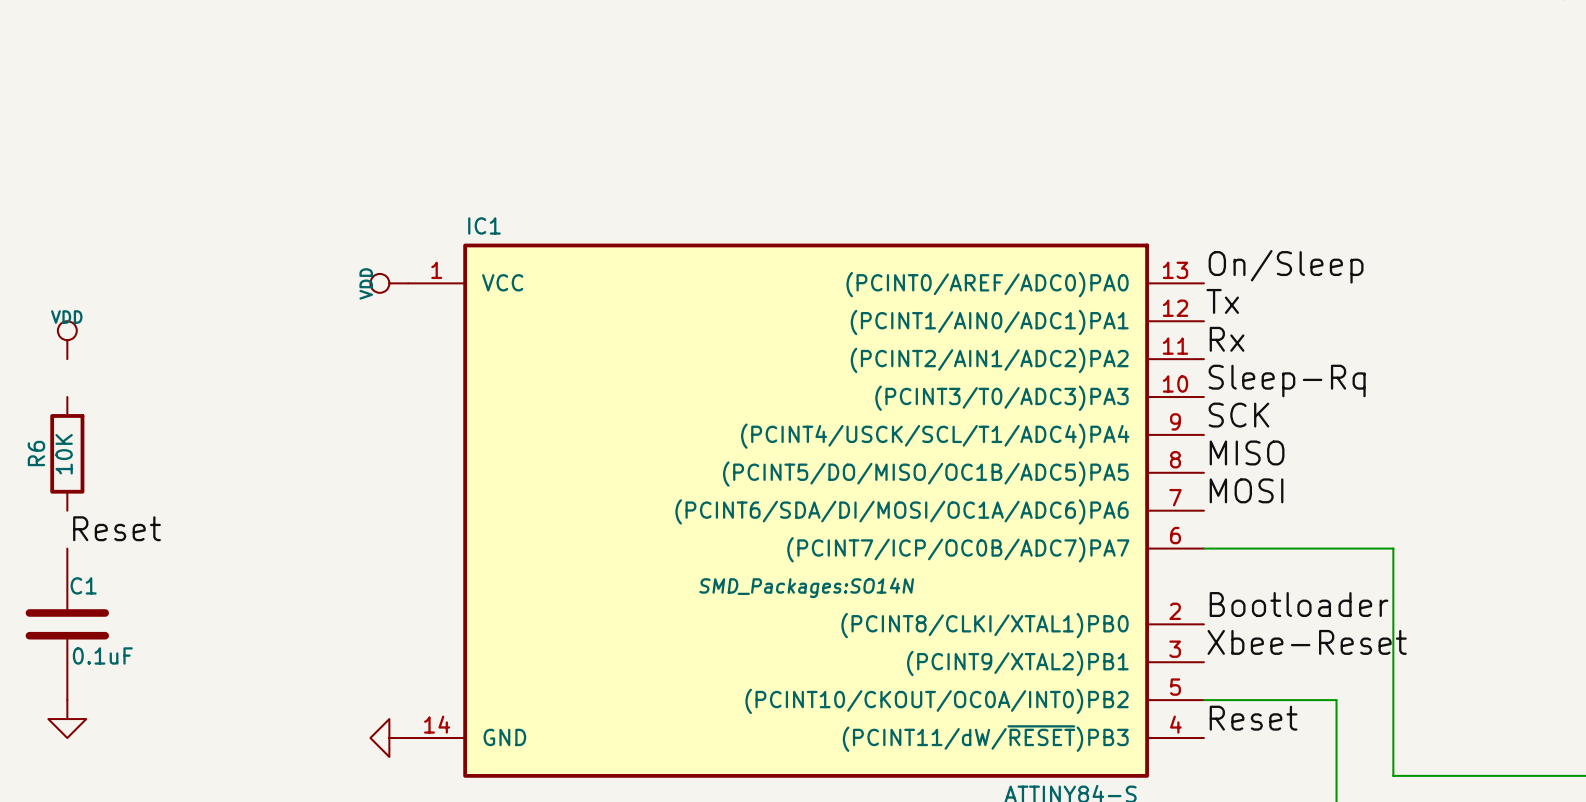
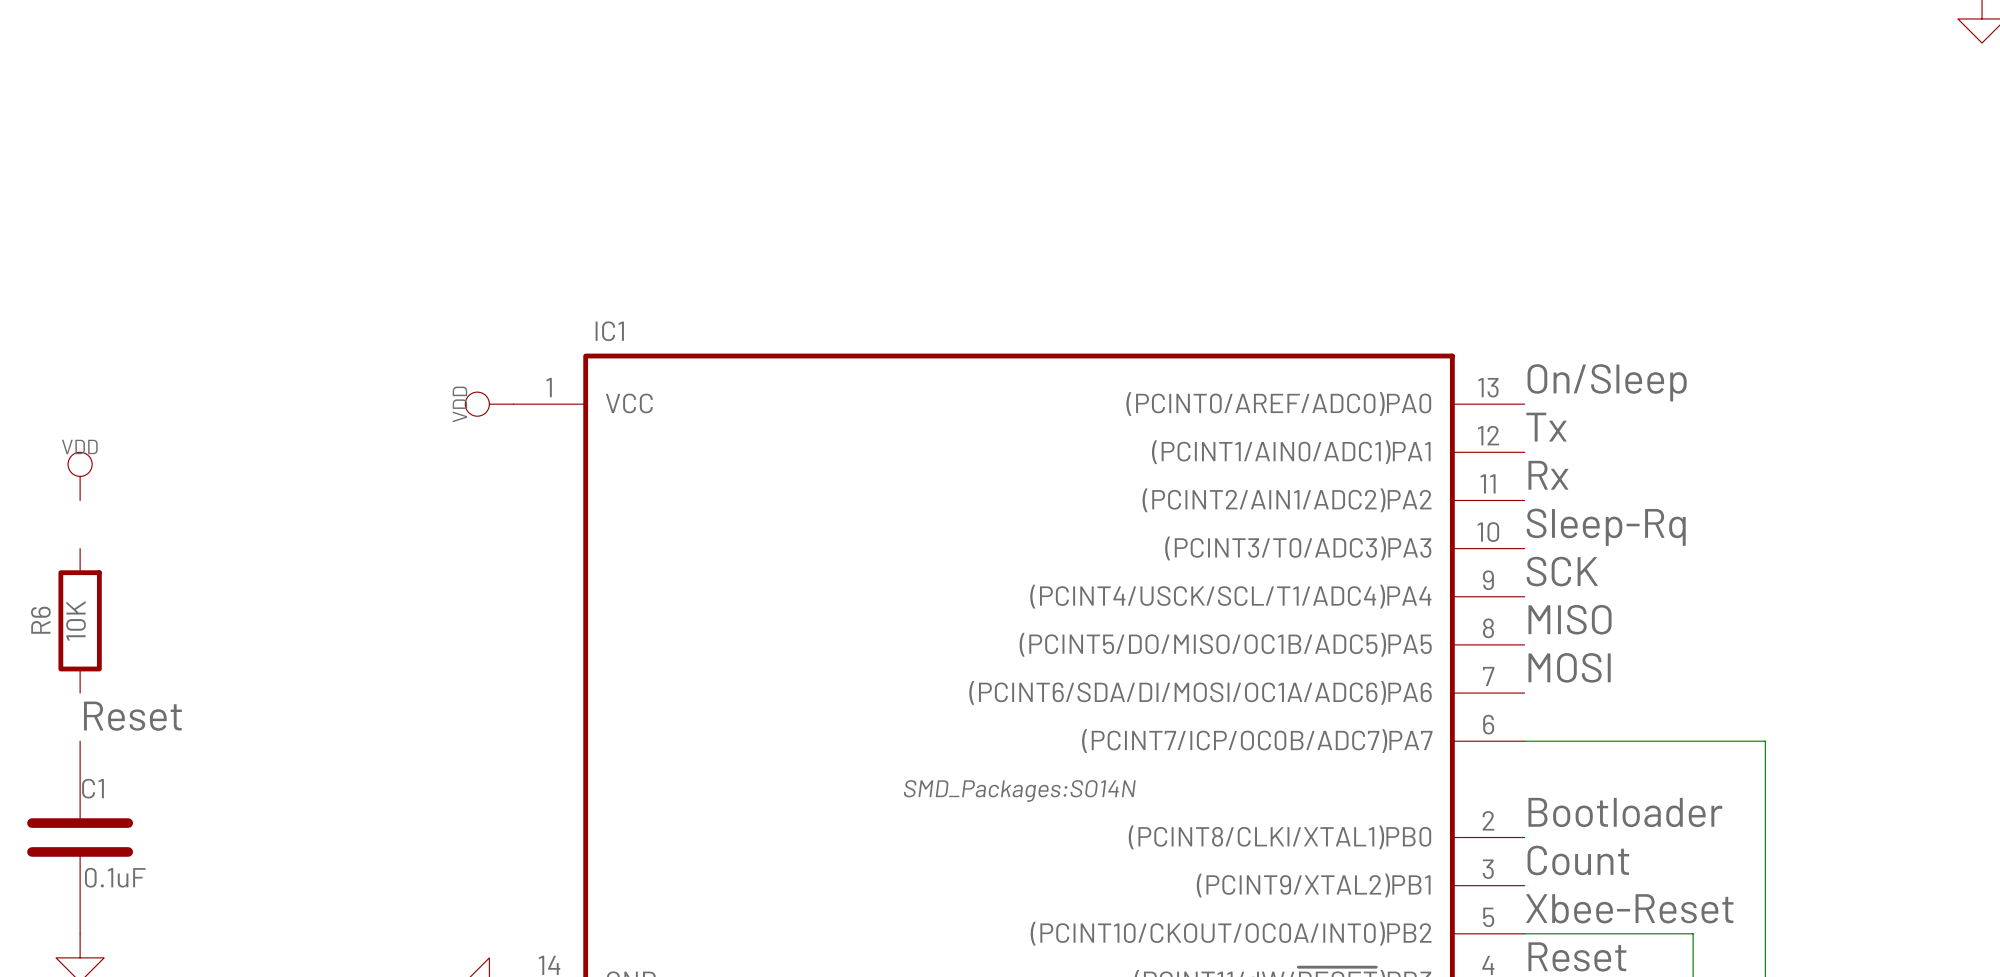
label: Xbee-Reset (1307, 642) -> Count (1578, 860)
label: none -> Xbee-Reset (1629, 908)

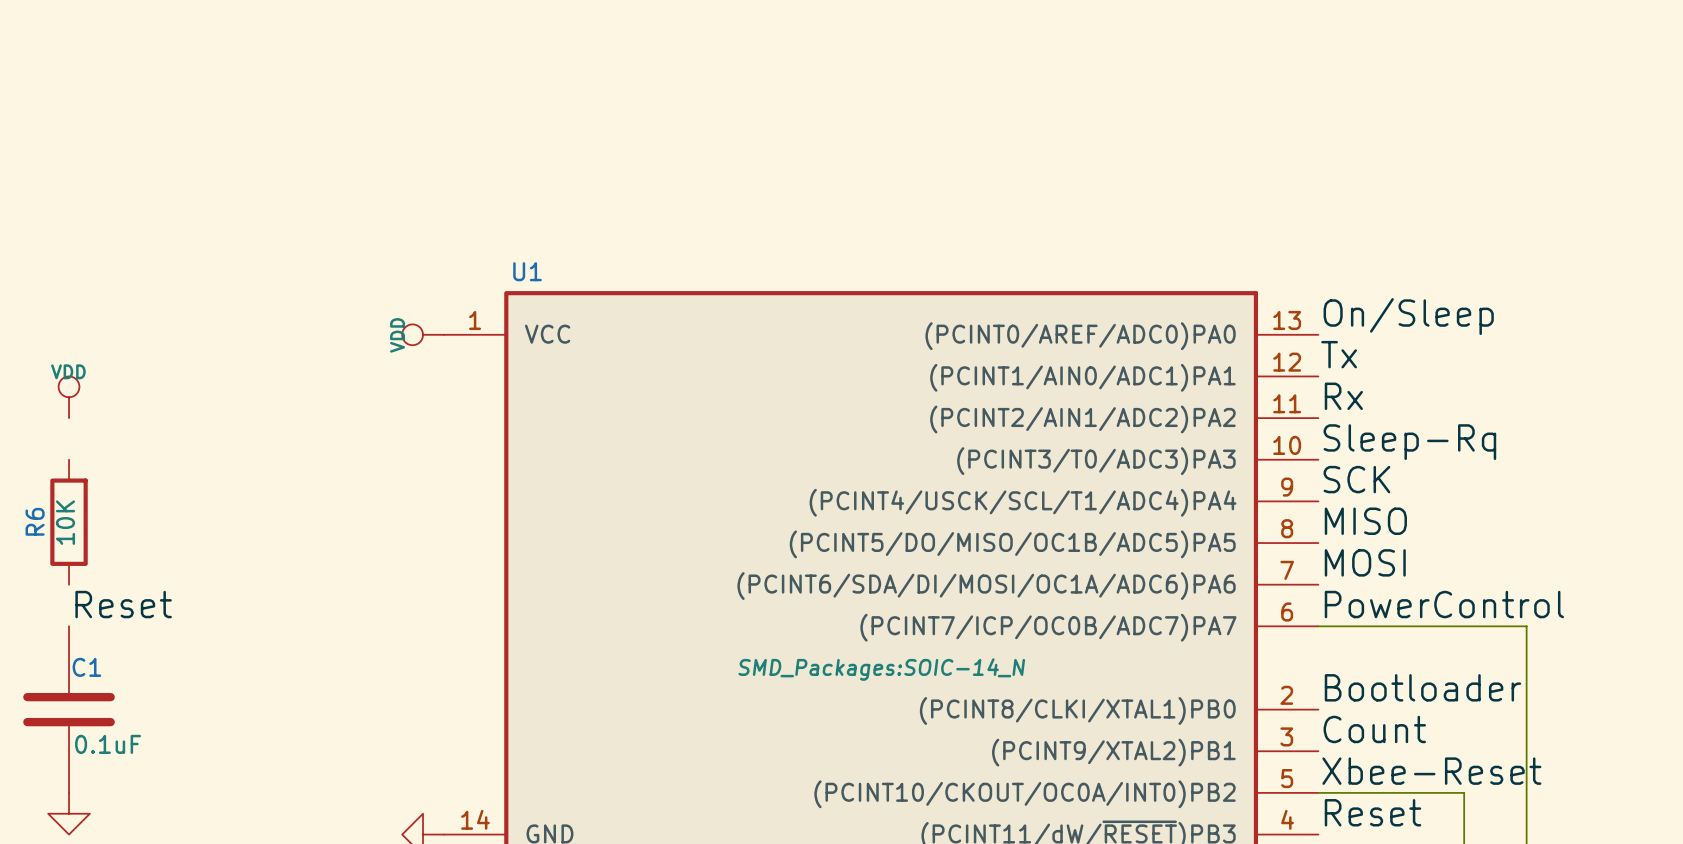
IC1 name: IC1 (609, 331) -> U1 (527, 271)
label: none -> PowerControl (1444, 604)
IC1 text: SMD_Packages:SO14N (1019, 791) -> SMD_Packages:SOIC-14_N (881, 669)

